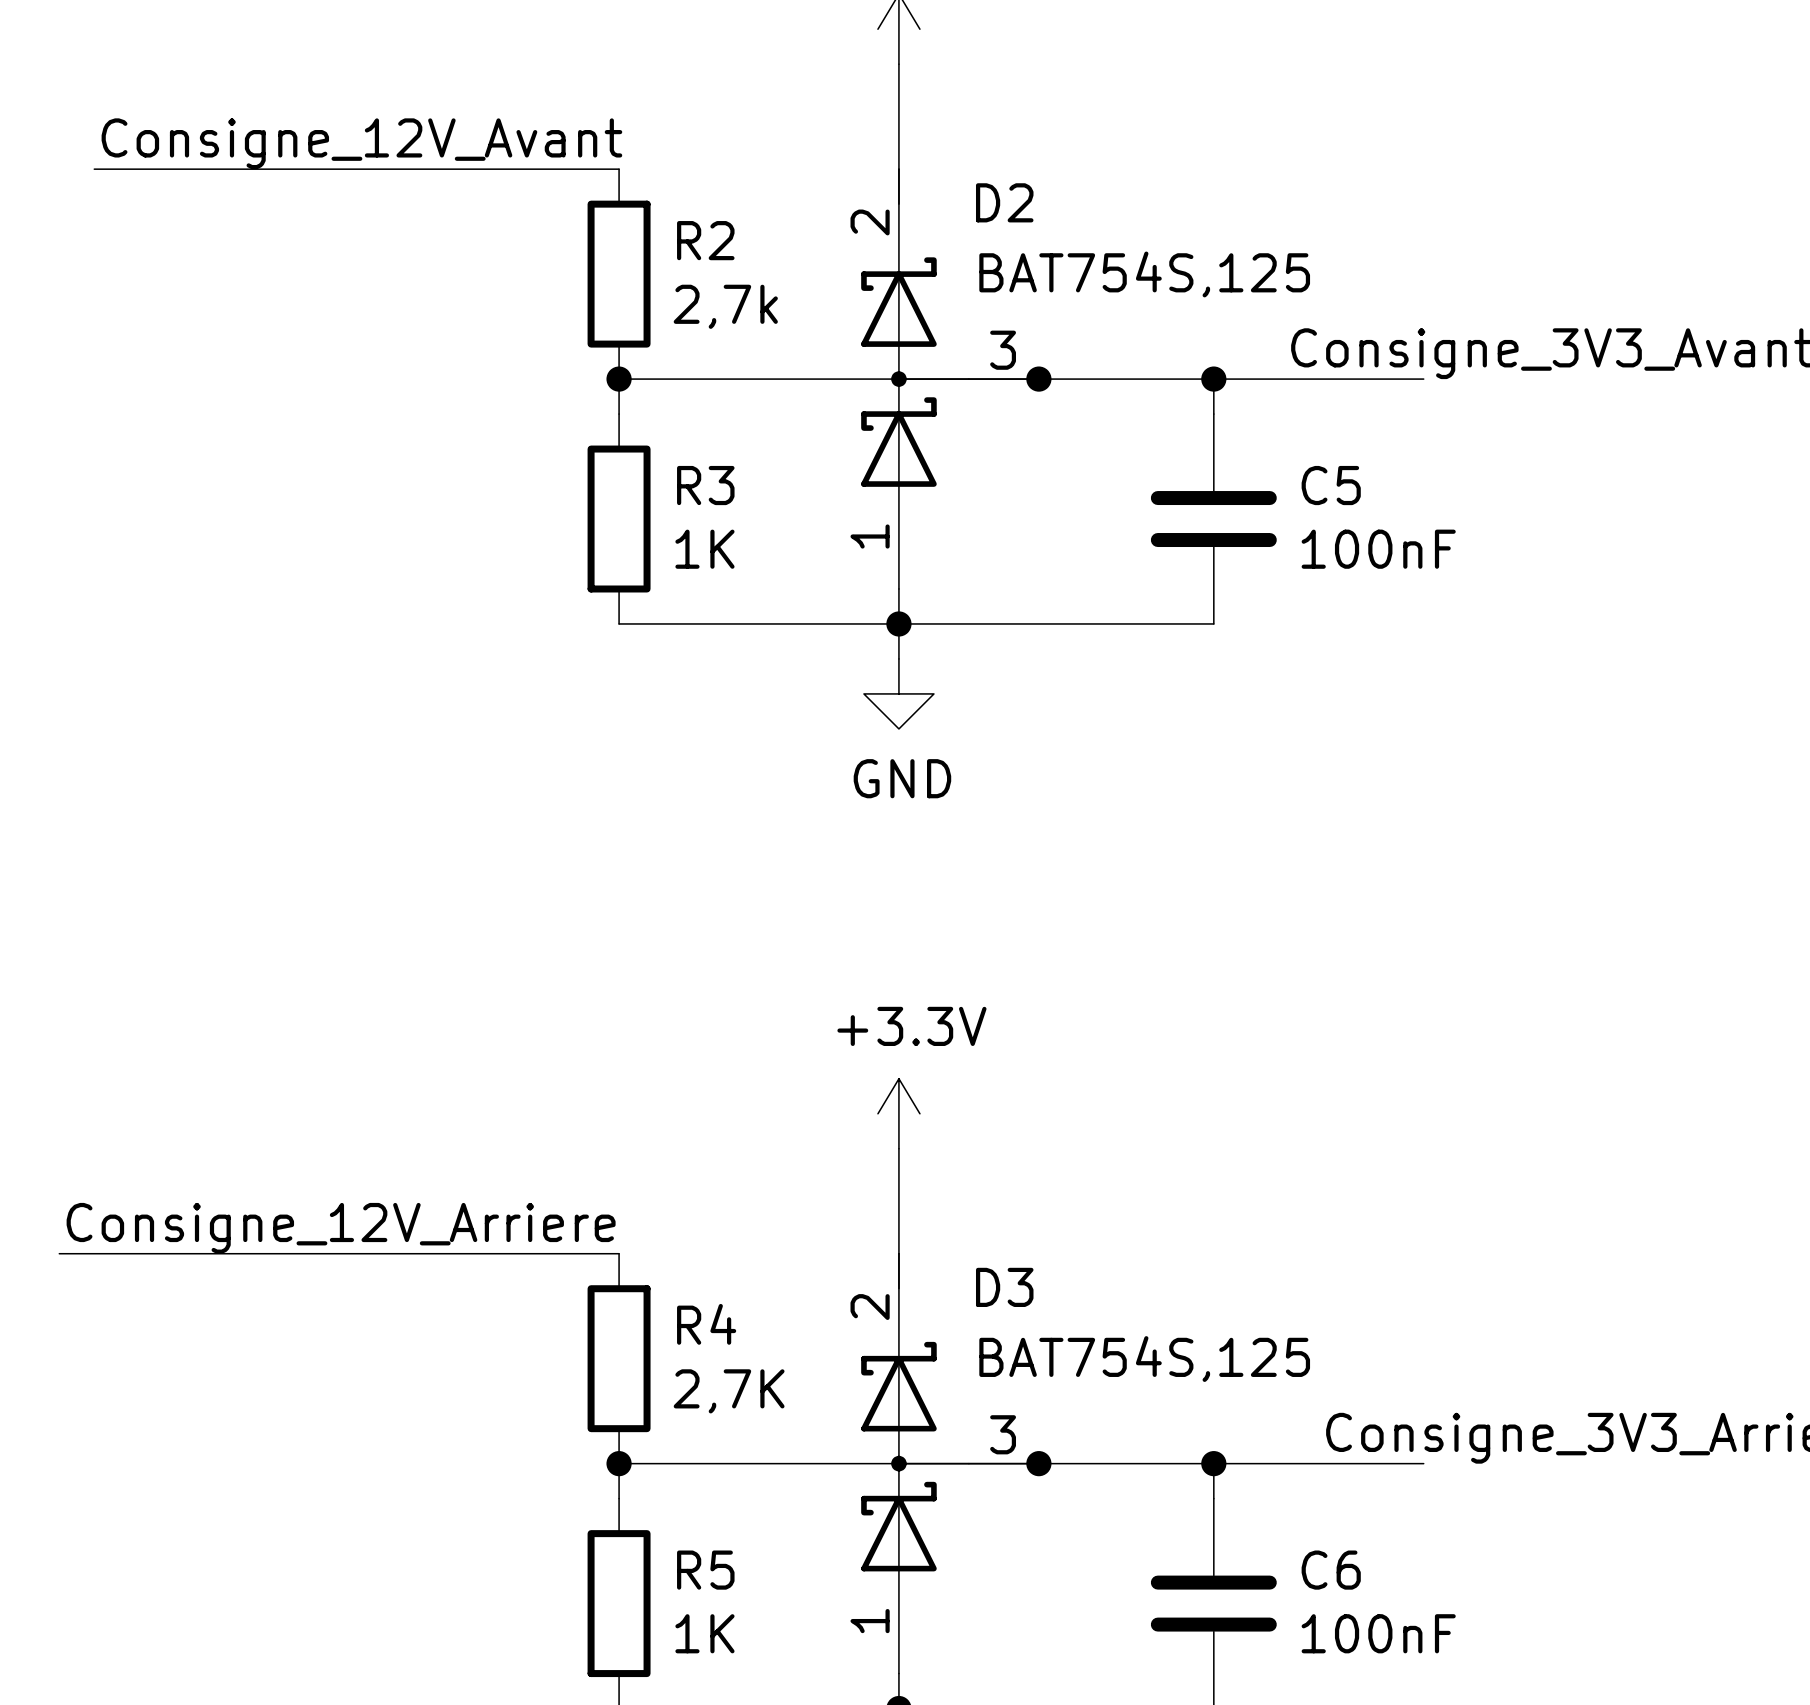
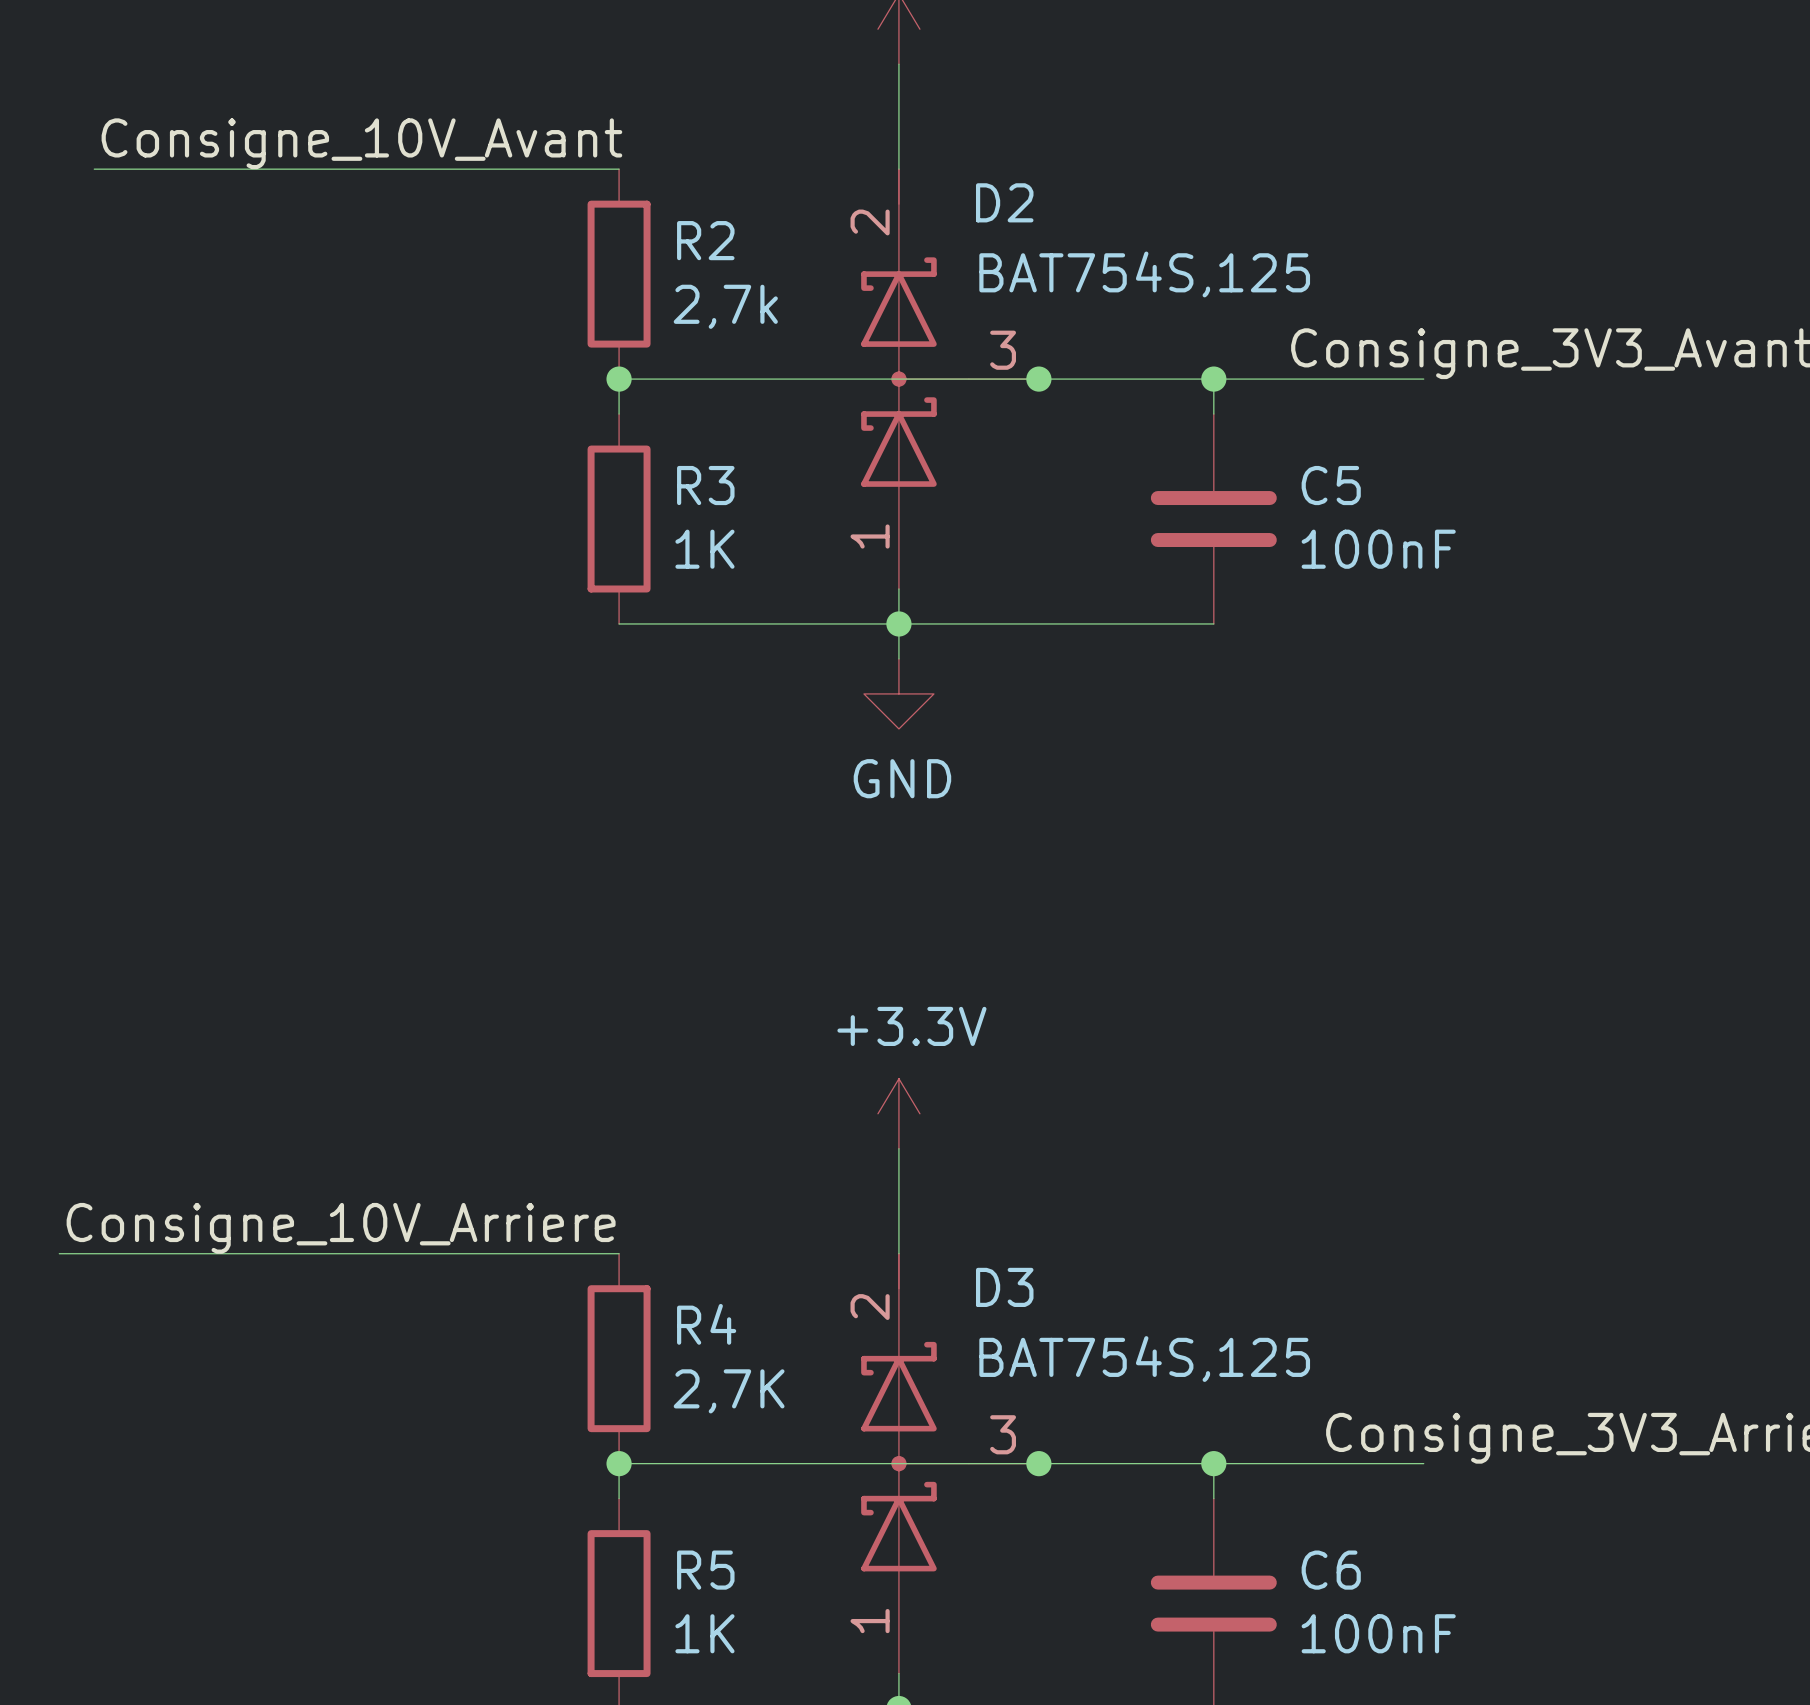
label: Consigne_12V_Avant (361, 143) -> Consigne_10V_Avant (361, 143)
label: Consigne_12V_Arriere (341, 1228) -> Consigne_10V_Arriere (341, 1228)

